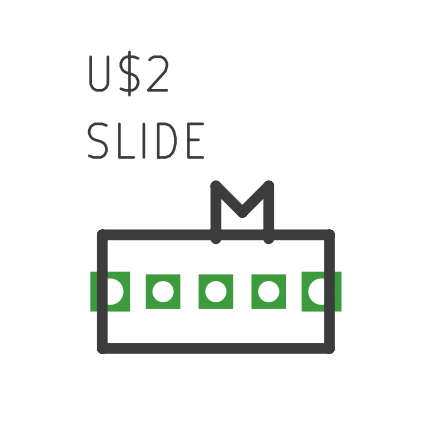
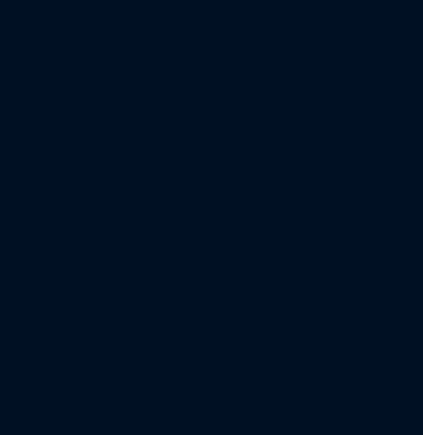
U$2: SLIDE (215, 267) -> none

